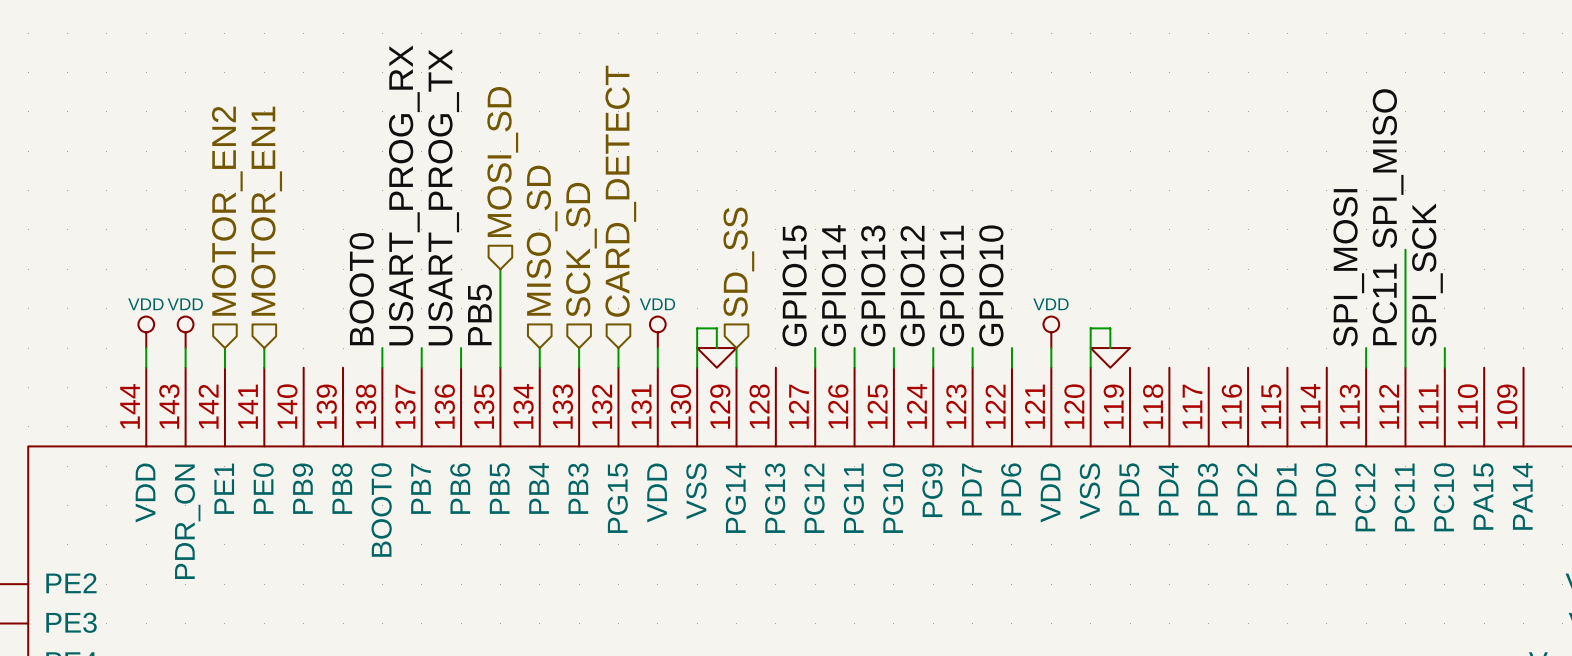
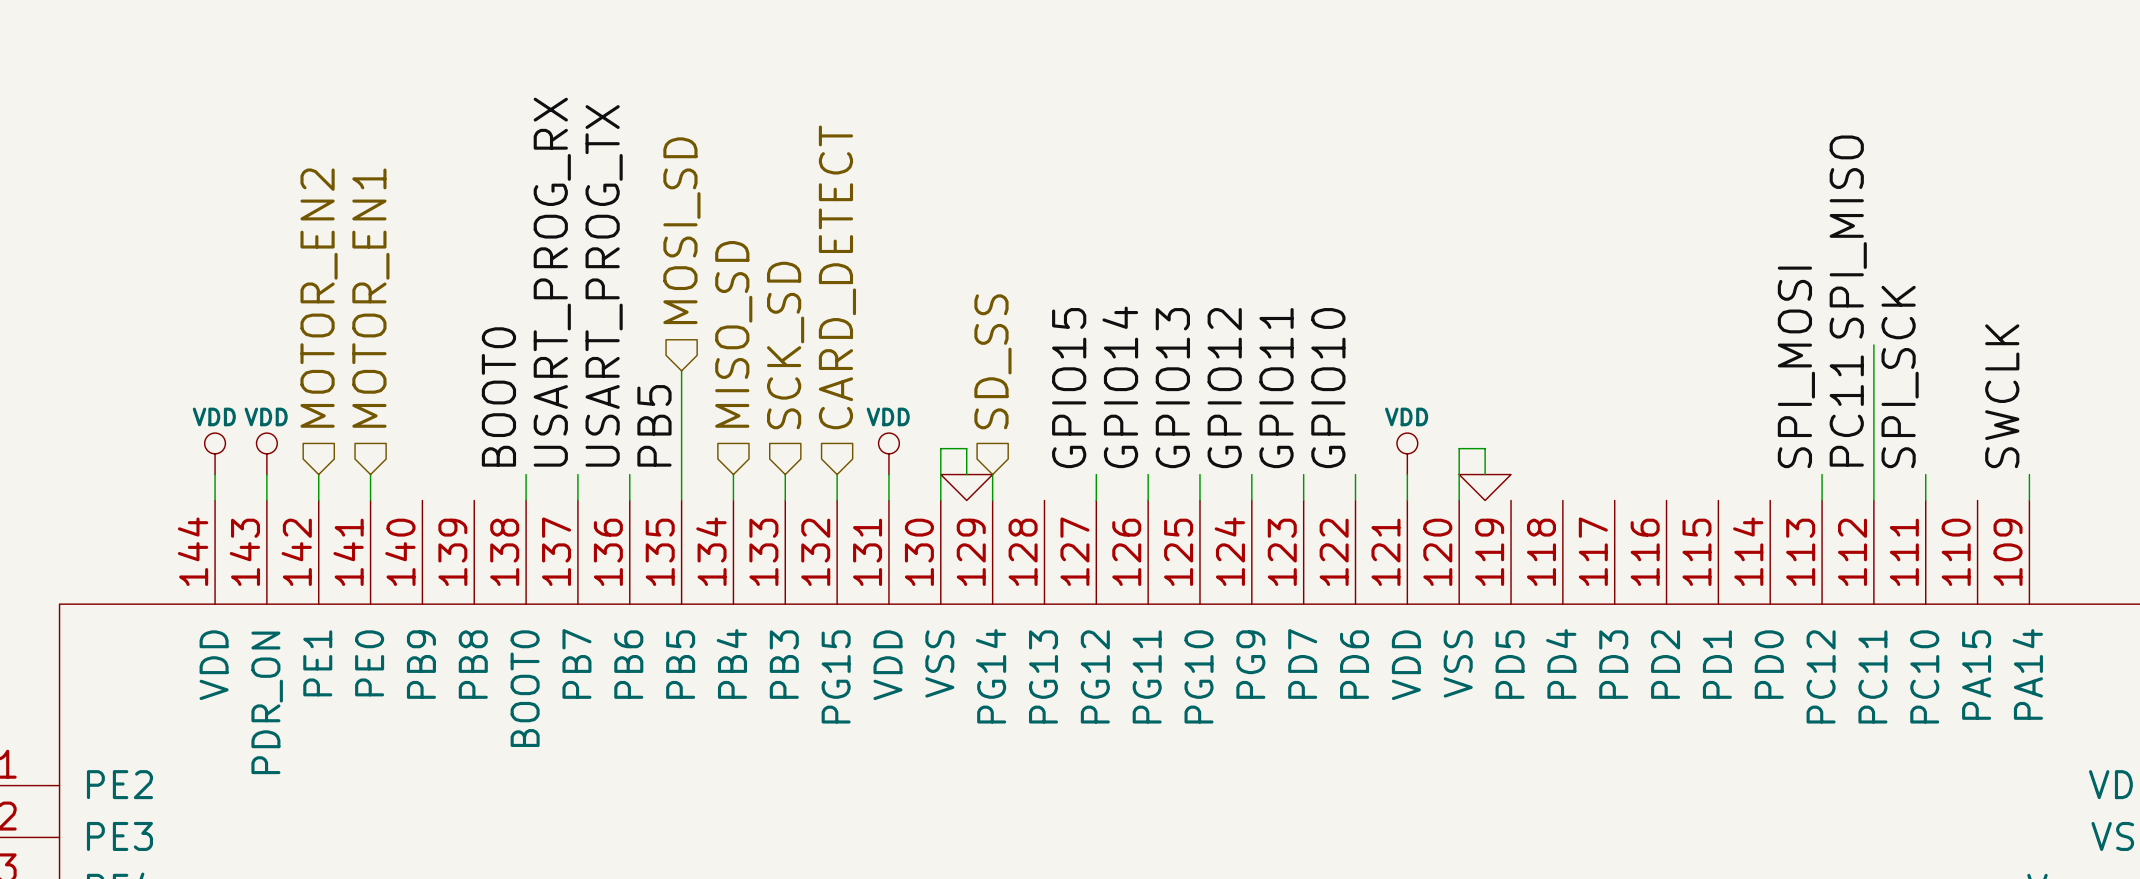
label: none -> SWCLK (2002, 396)
wire: none -> (2029, 474) (2029, 500)

